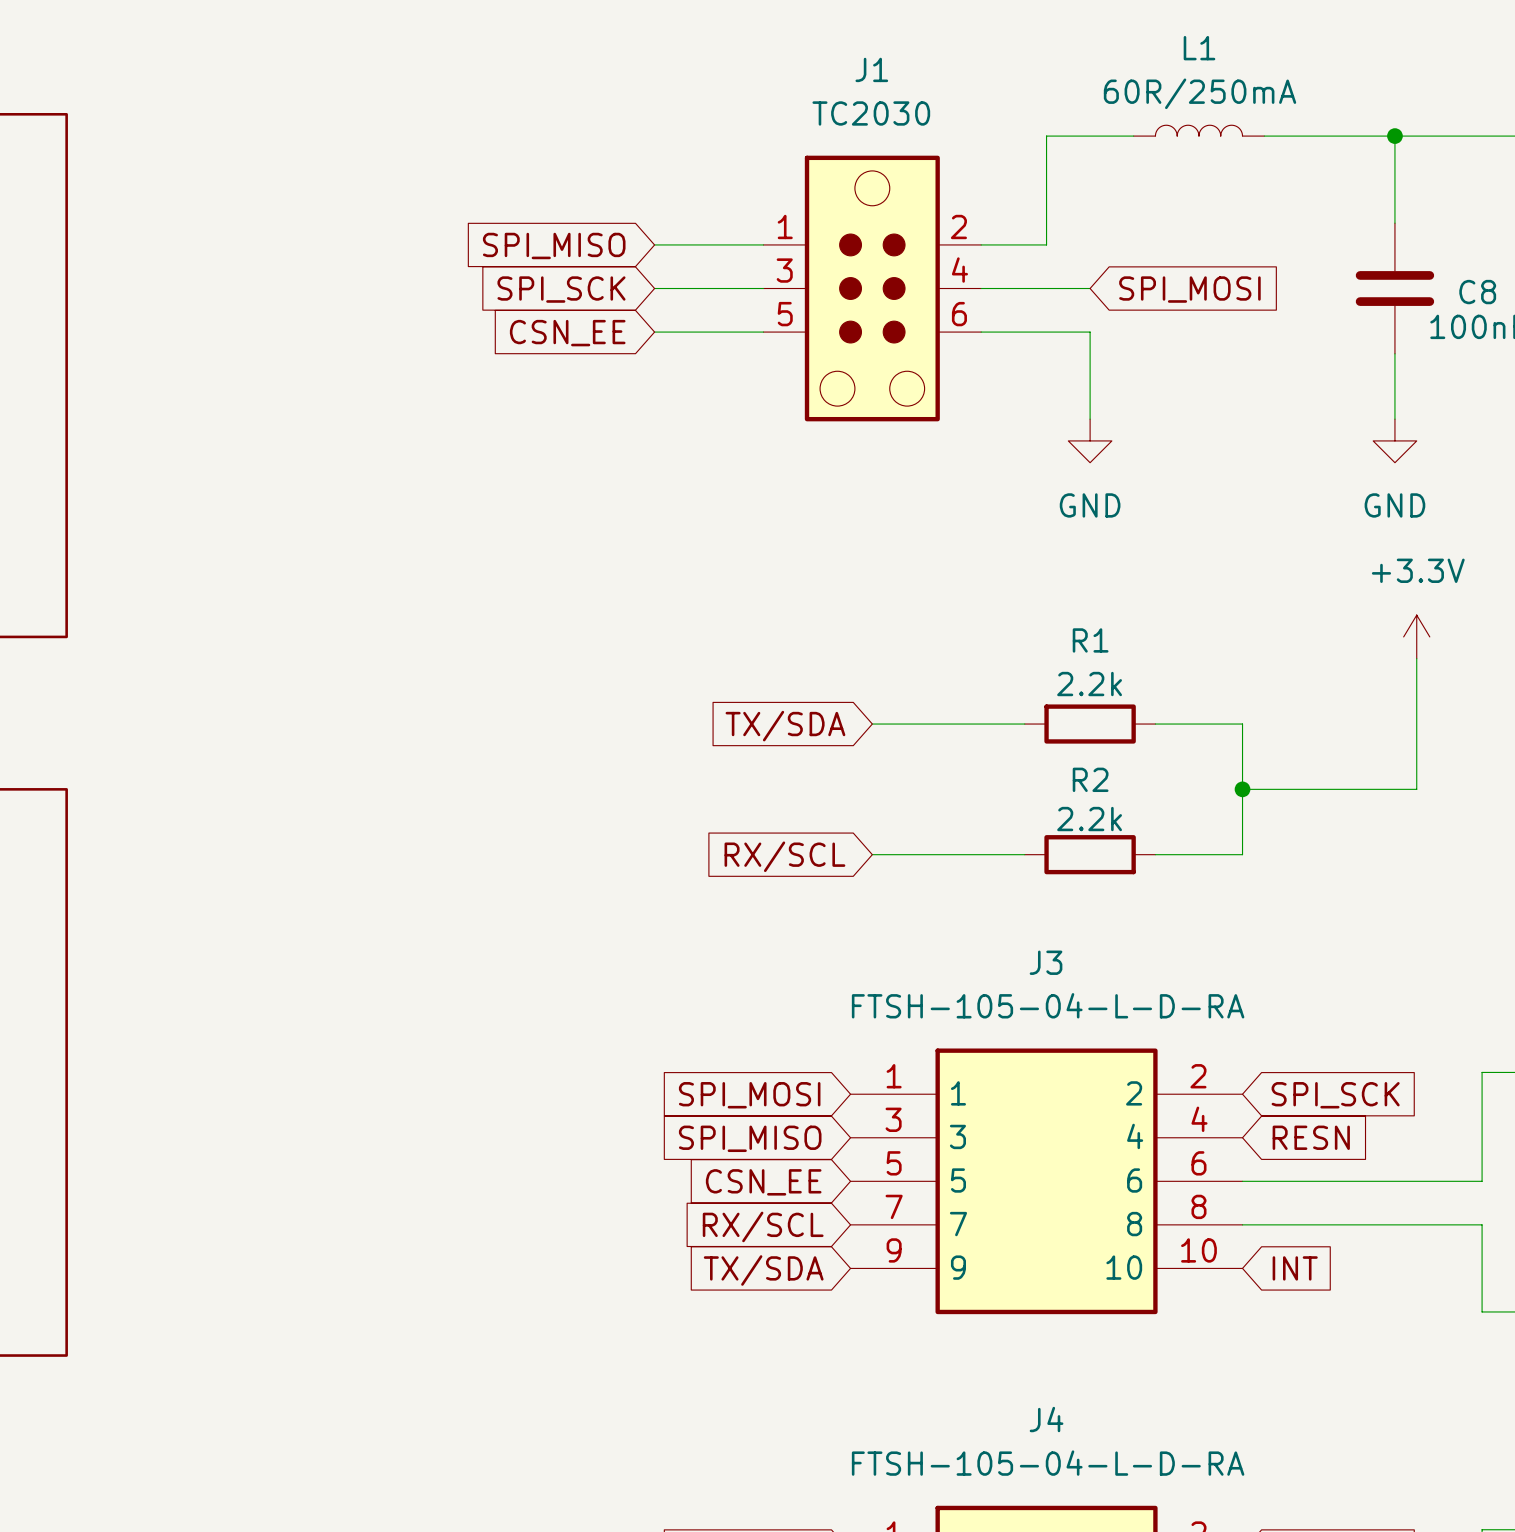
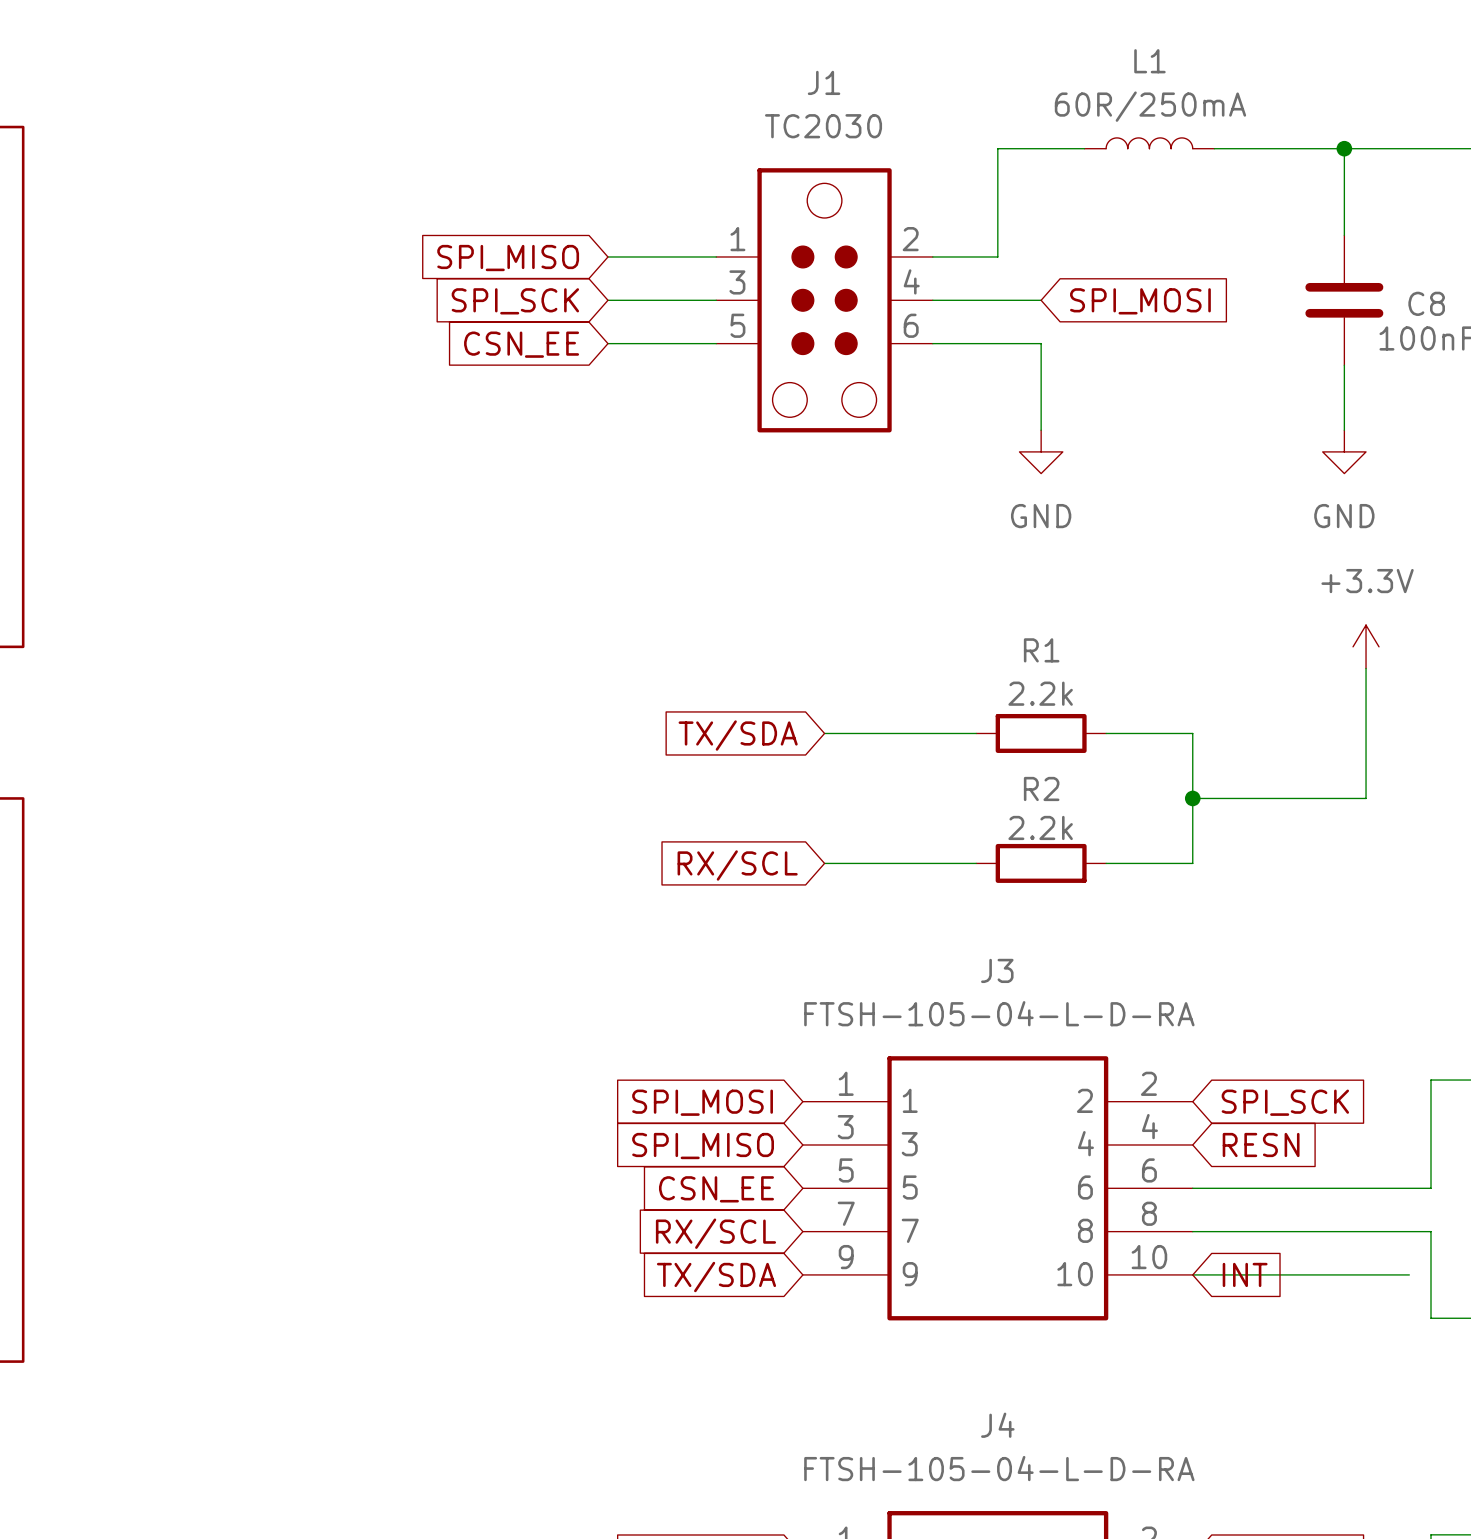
wire: none -> (1192, 1274) (1409, 1274)

